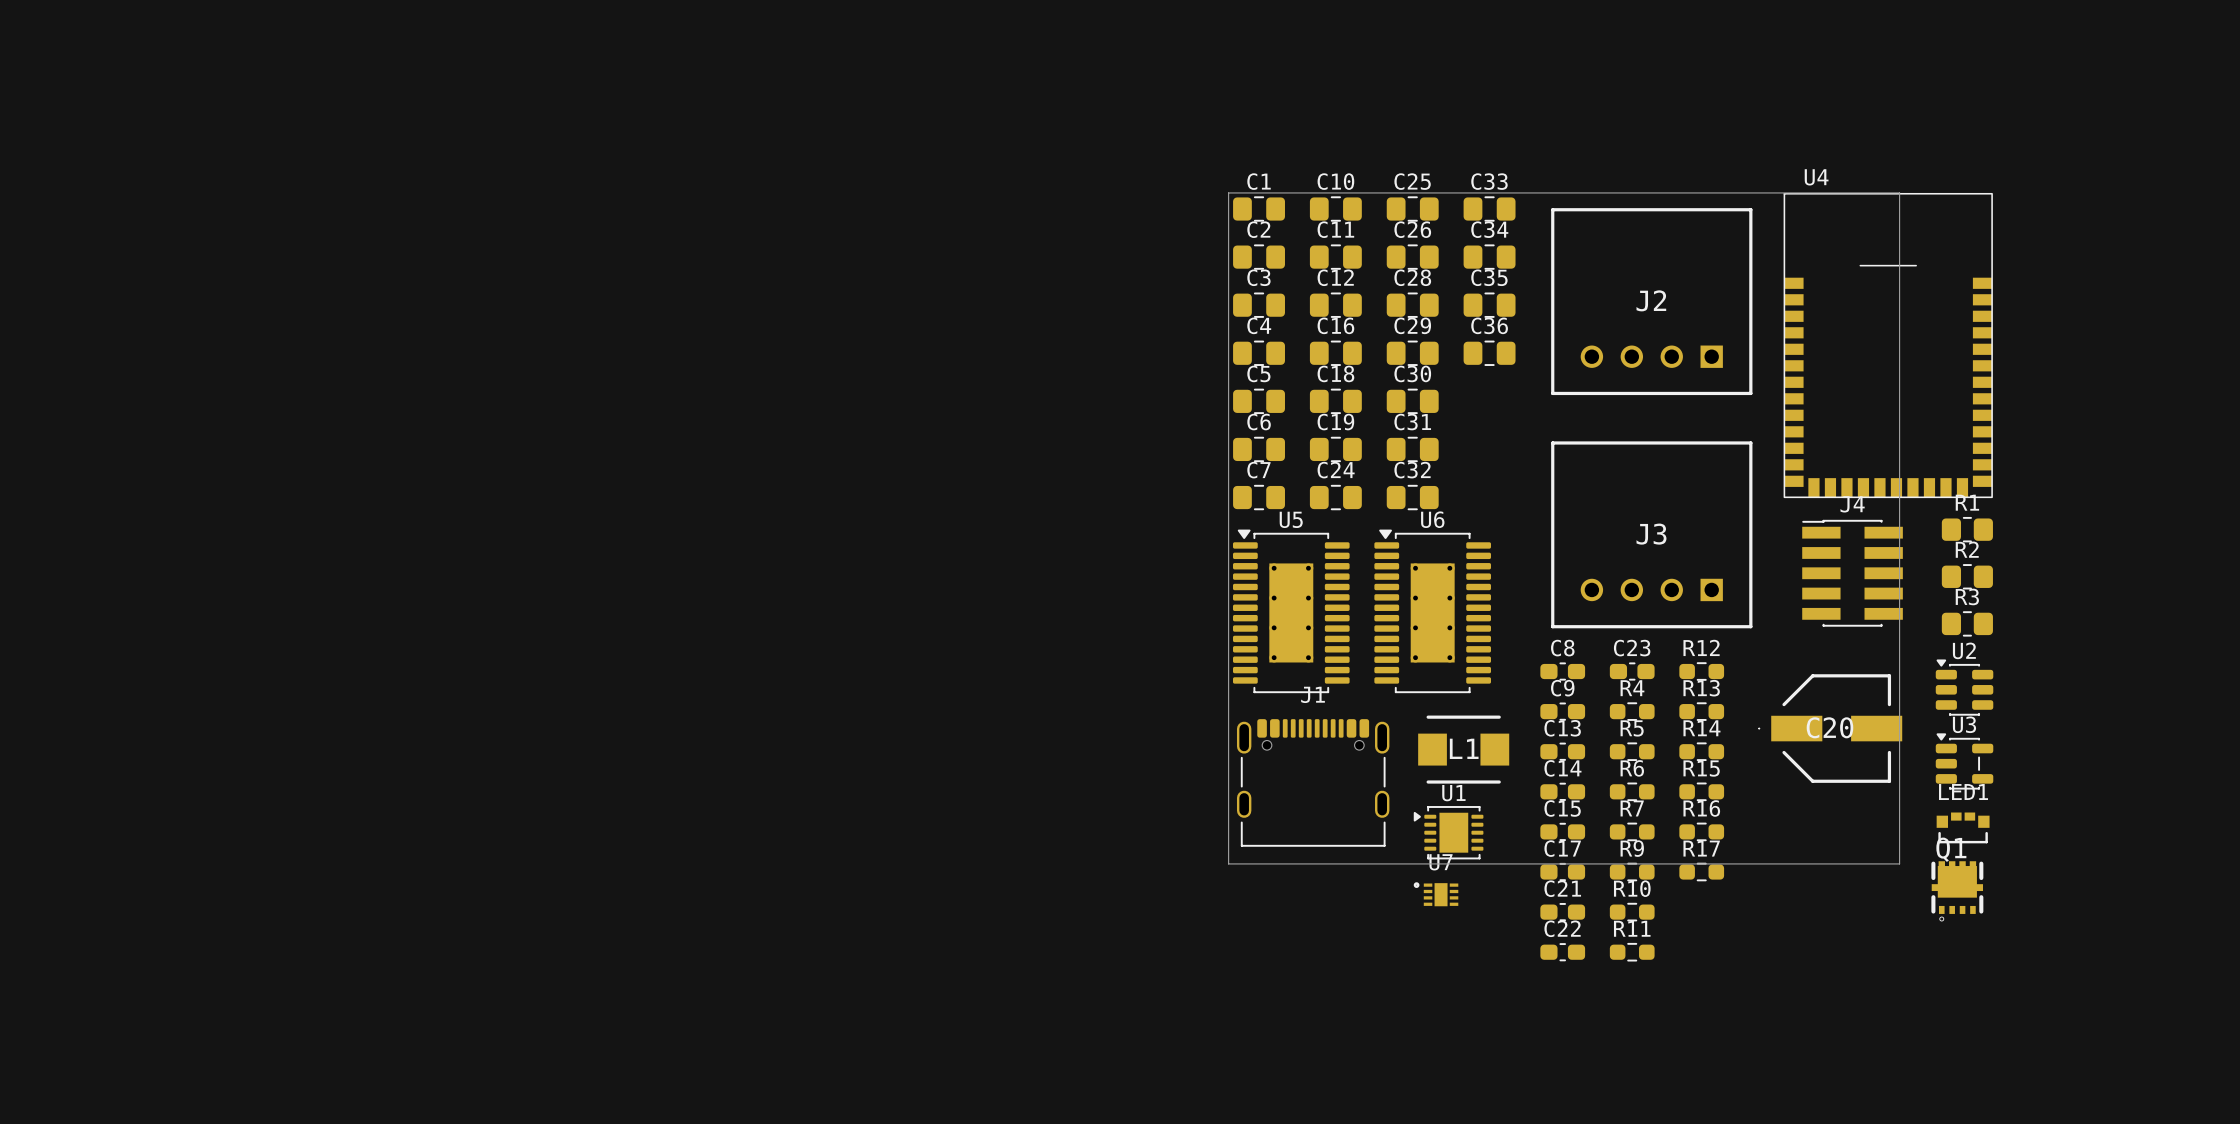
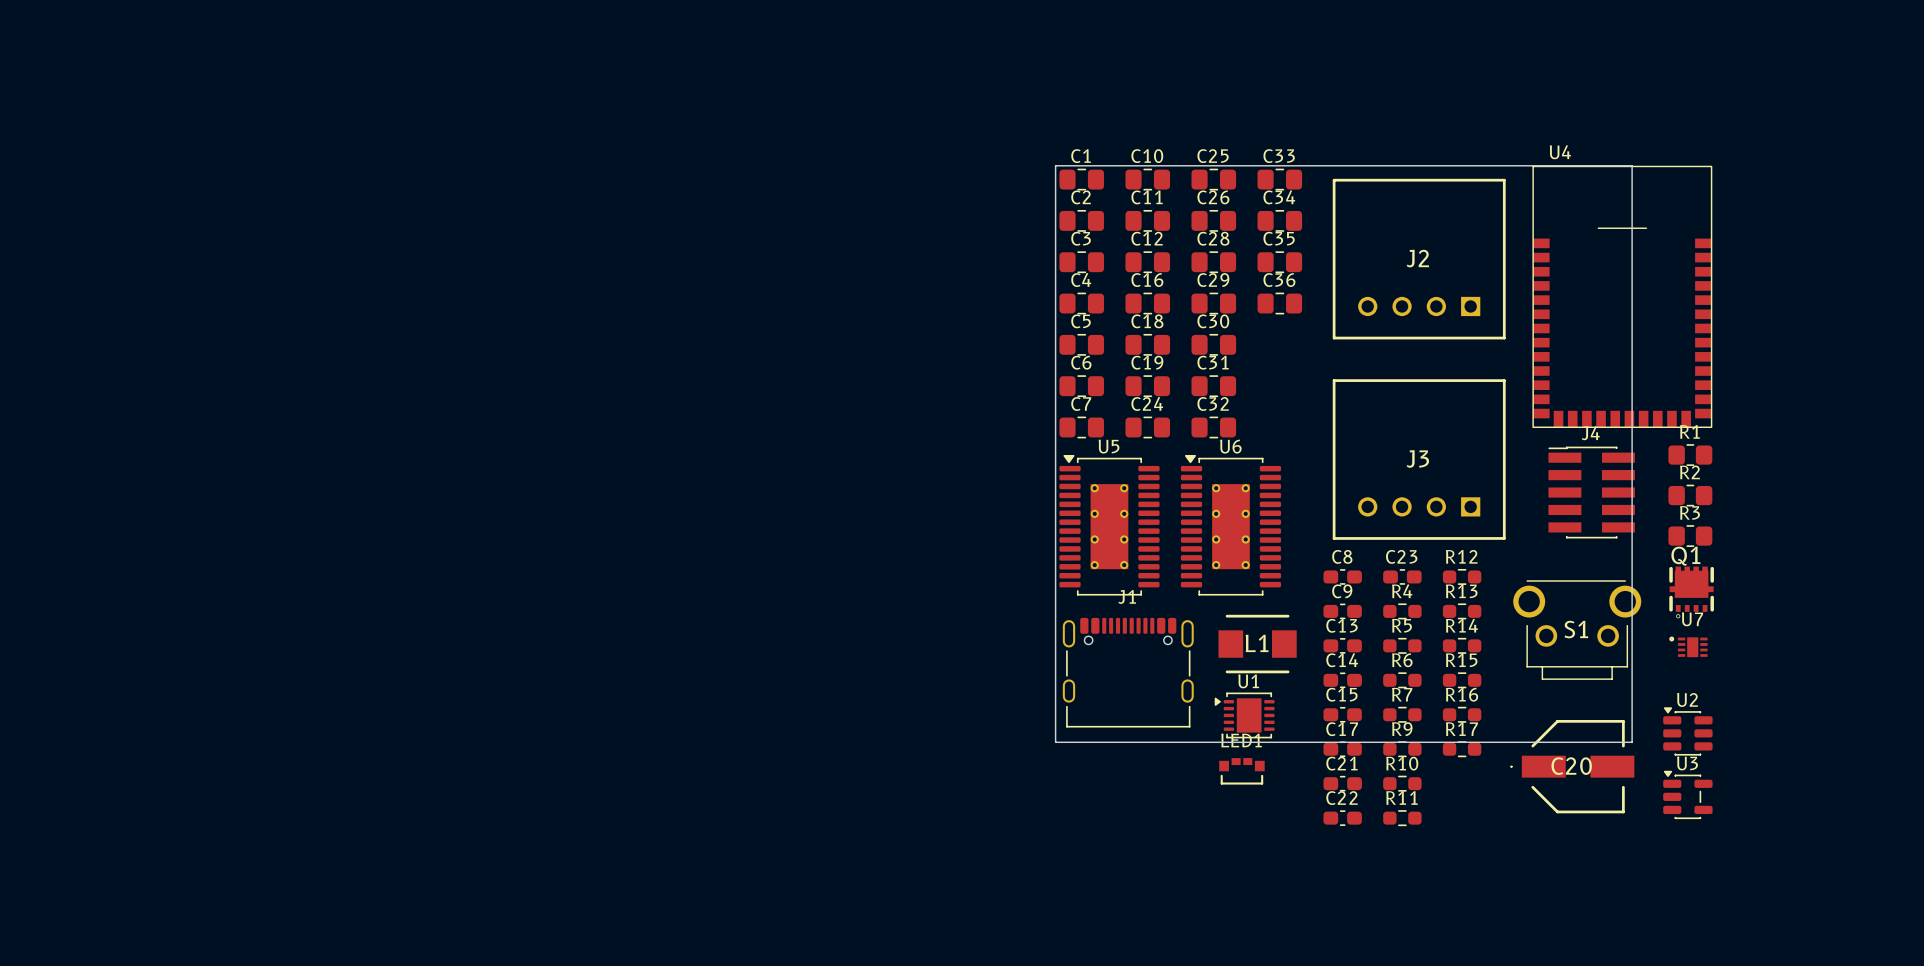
U2 position: (1964, 687) -> (1687, 731)
C20 position: (1830, 728) -> (1572, 766)
S1: none -> (1577, 630)
U3 position: (1964, 761) -> (1687, 794)
LED1 position: (1963, 827) -> (1241, 771)
Q1 position: (1957, 891) -> (1691, 592)
U7 position: (1436, 894) -> (1688, 646)

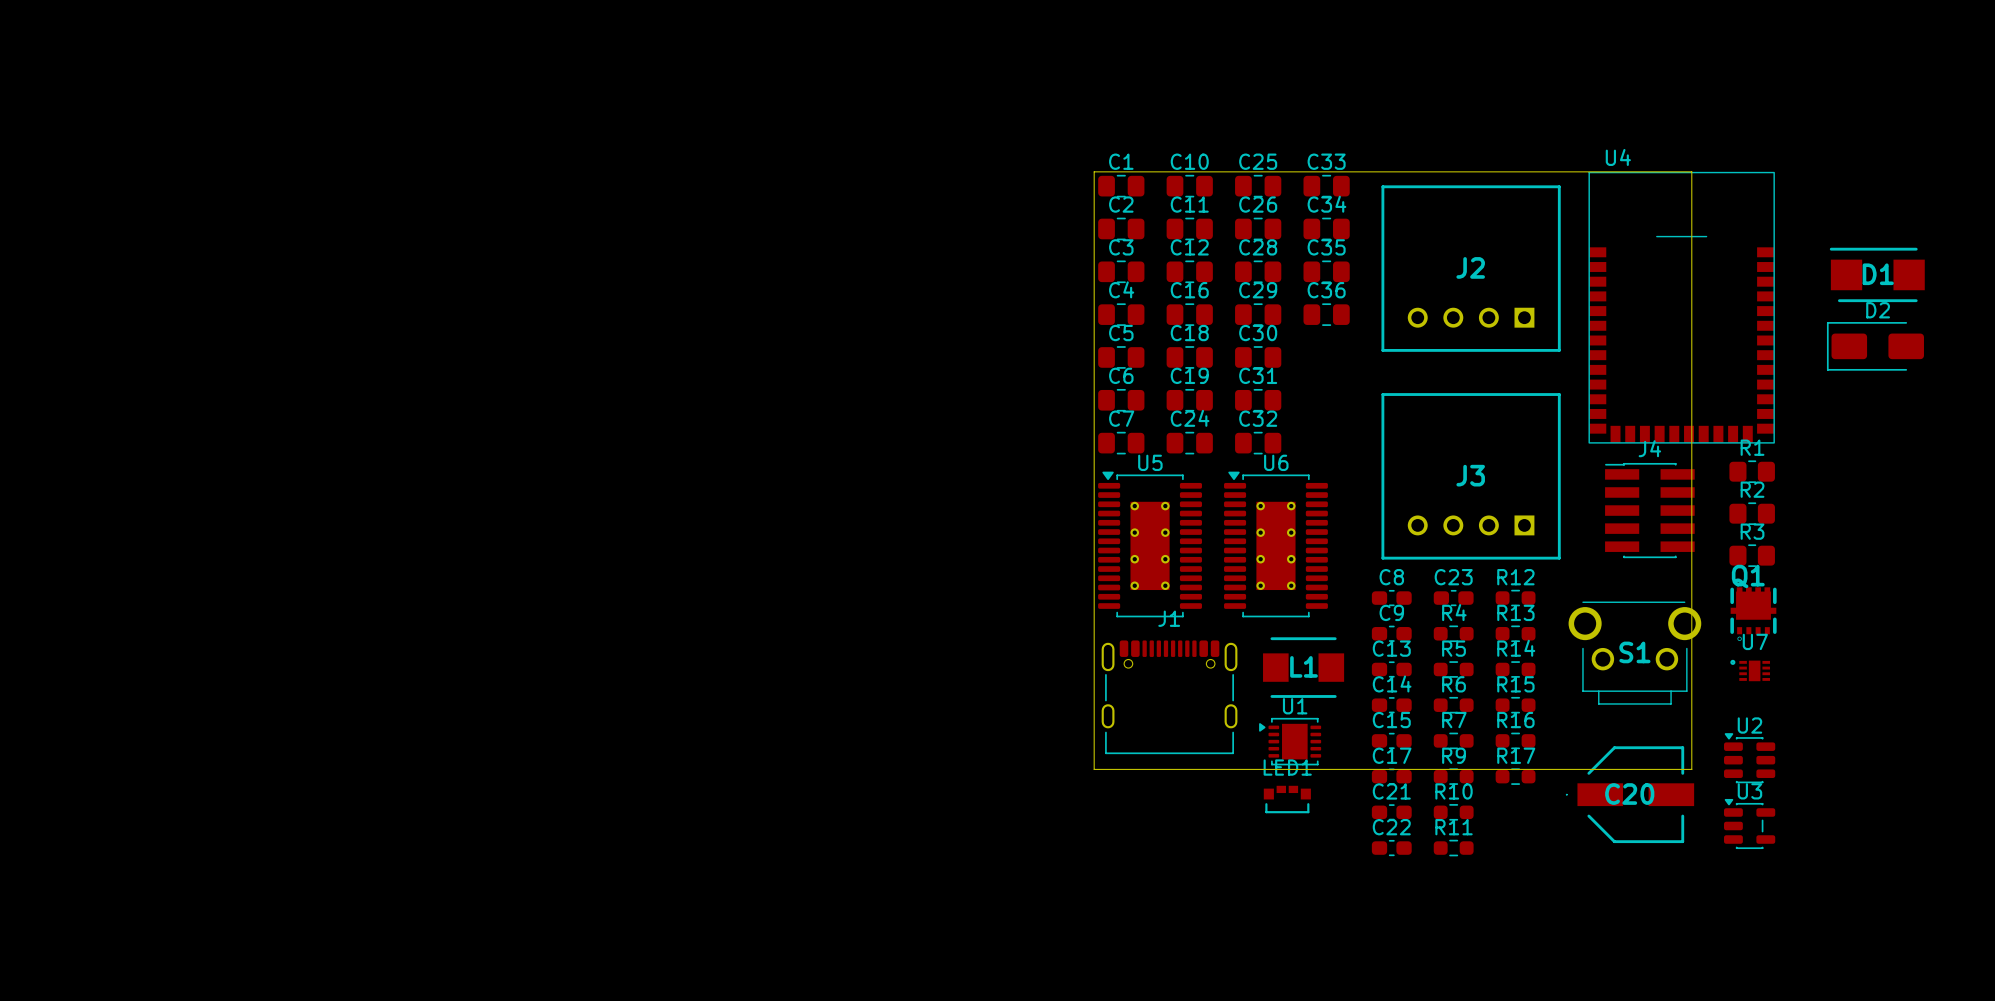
D1: none -> (1877, 274)
D2: none -> (1875, 346)

